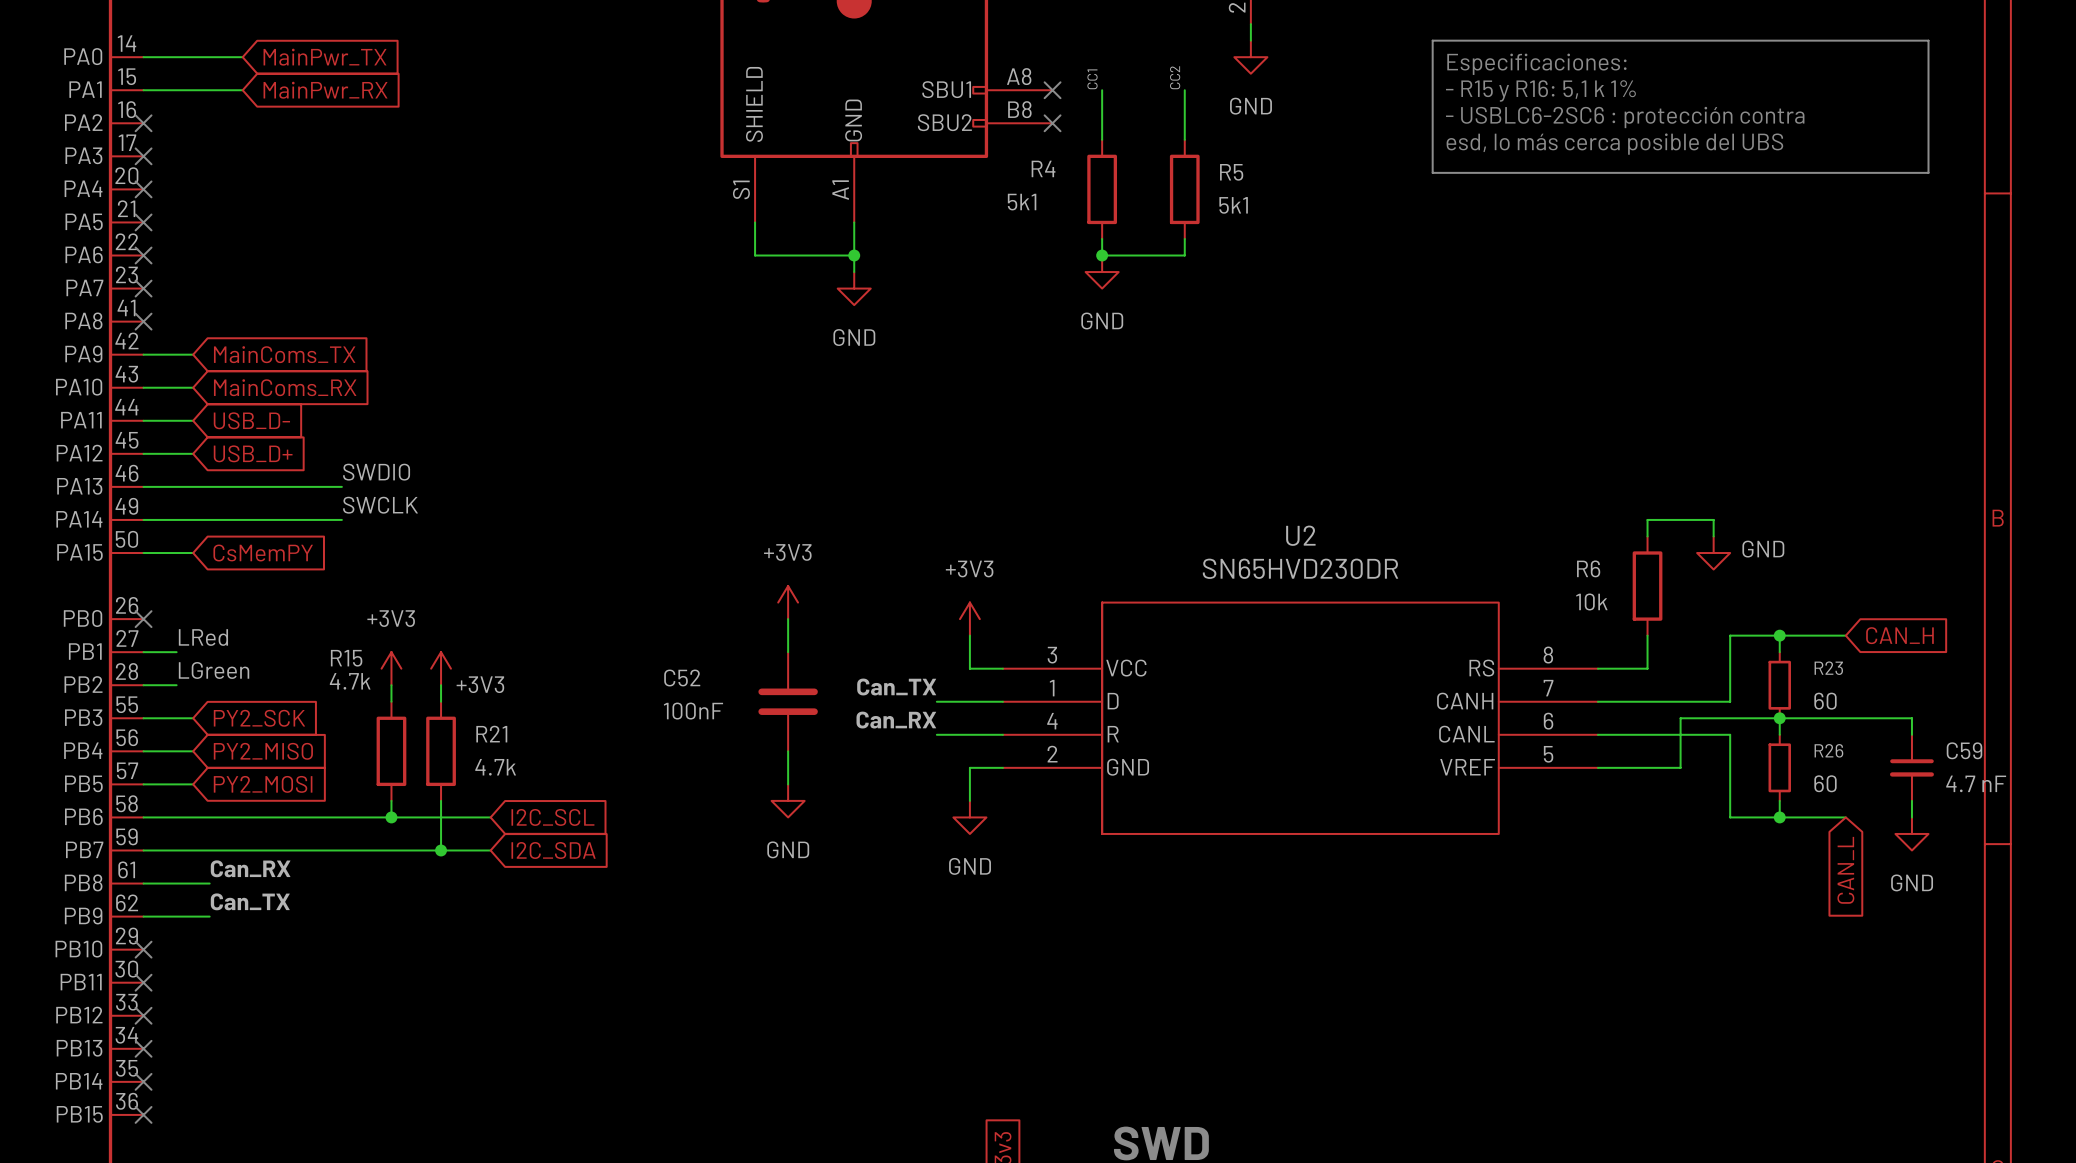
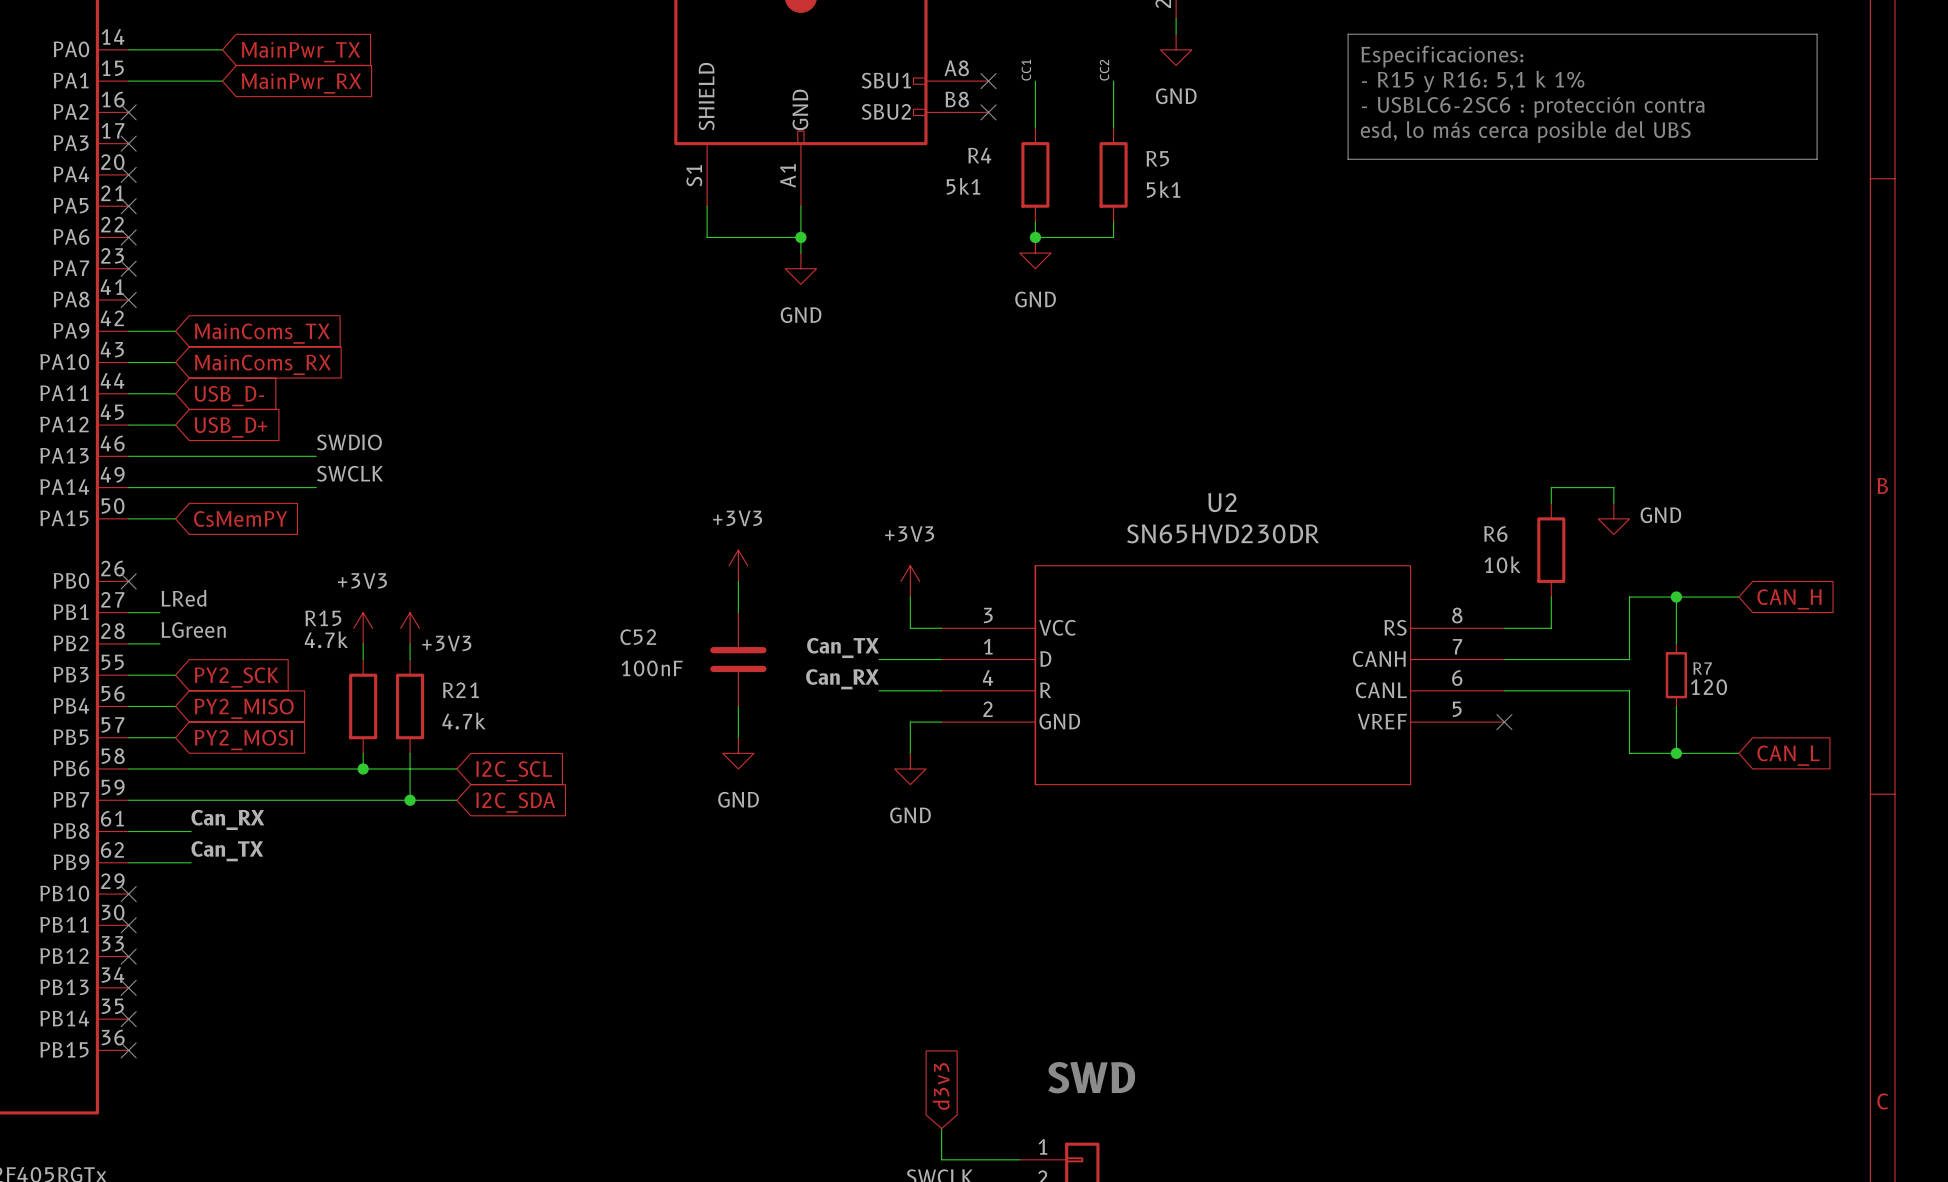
wire: none -> (1676, 612) (1676, 643)
R23: 60 (1779, 685) -> none
wire: (1779, 718) (1779, 734) -> none
junction: (1779, 718) -> none
R7: none -> 120 (1676, 675)
wire: (1911, 734) (1911, 718) (1680, 718) (1680, 767) (1597, 767) -> none
no-connect mark: none -> (1504, 722)
R26: 60 (1779, 767) -> none
C59: 4.7 nF (1911, 767) -> none
wire: (1730, 800) (1730, 817) (1845, 817) -> (1629, 753) (1738, 753)
wire: (1779, 800) (1779, 817) -> (1676, 753) (1676, 706)
wire: (1911, 800) (1911, 817) -> none
junction position: (1779, 817) -> (1676, 753)
power symbol: GND (1911, 833) -> none
global label rotation: 0° (1845, 870) -> 90° counterclockwise (1788, 755)

